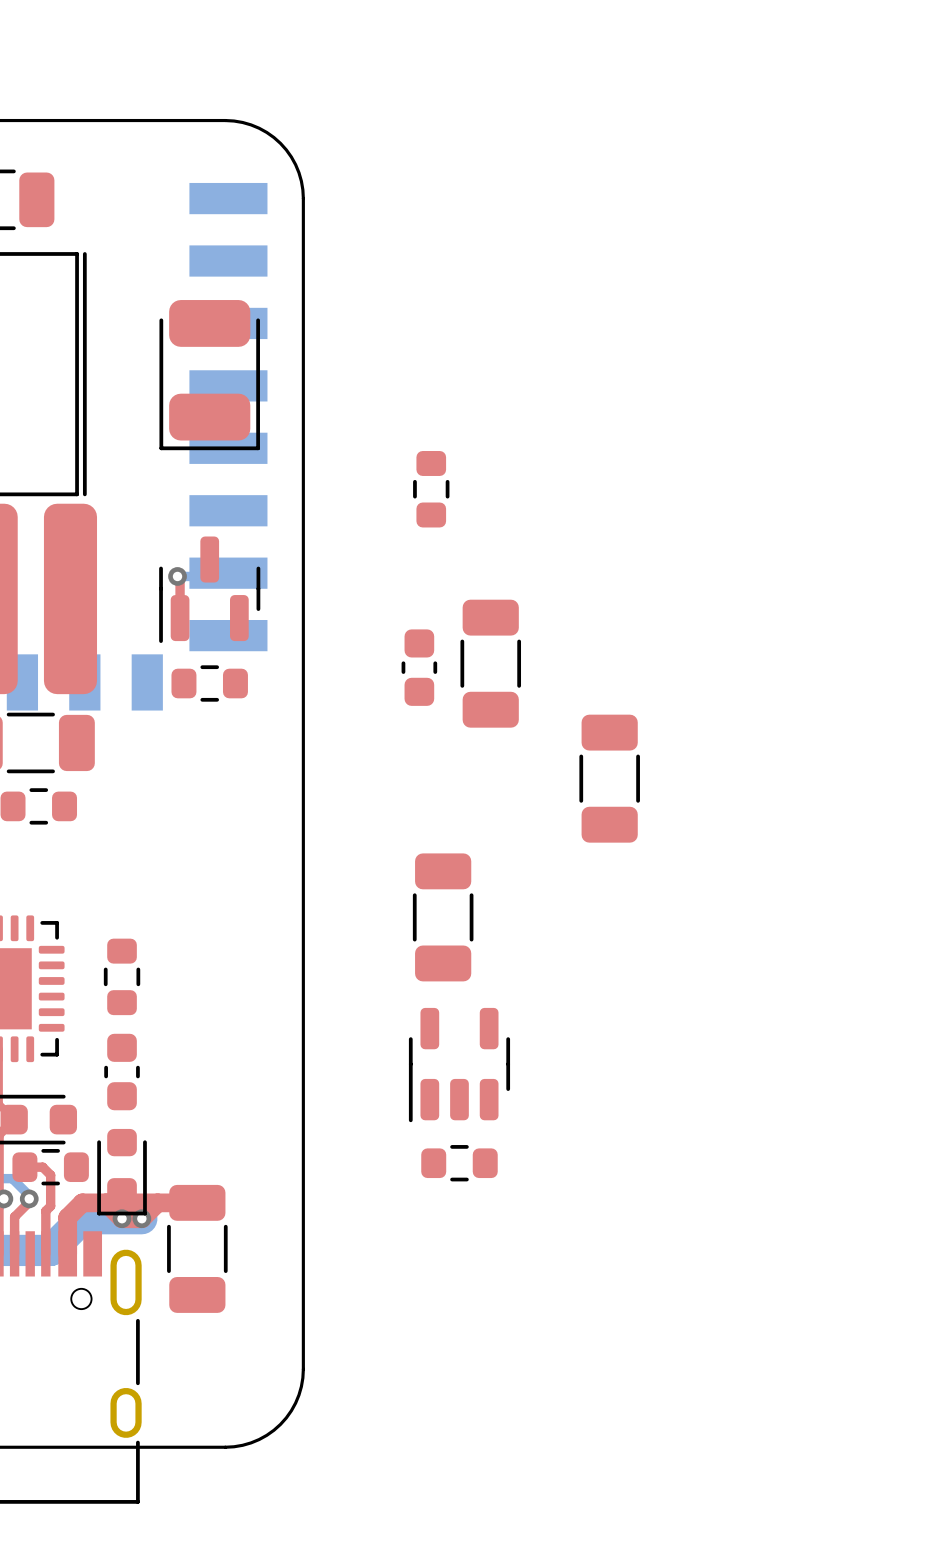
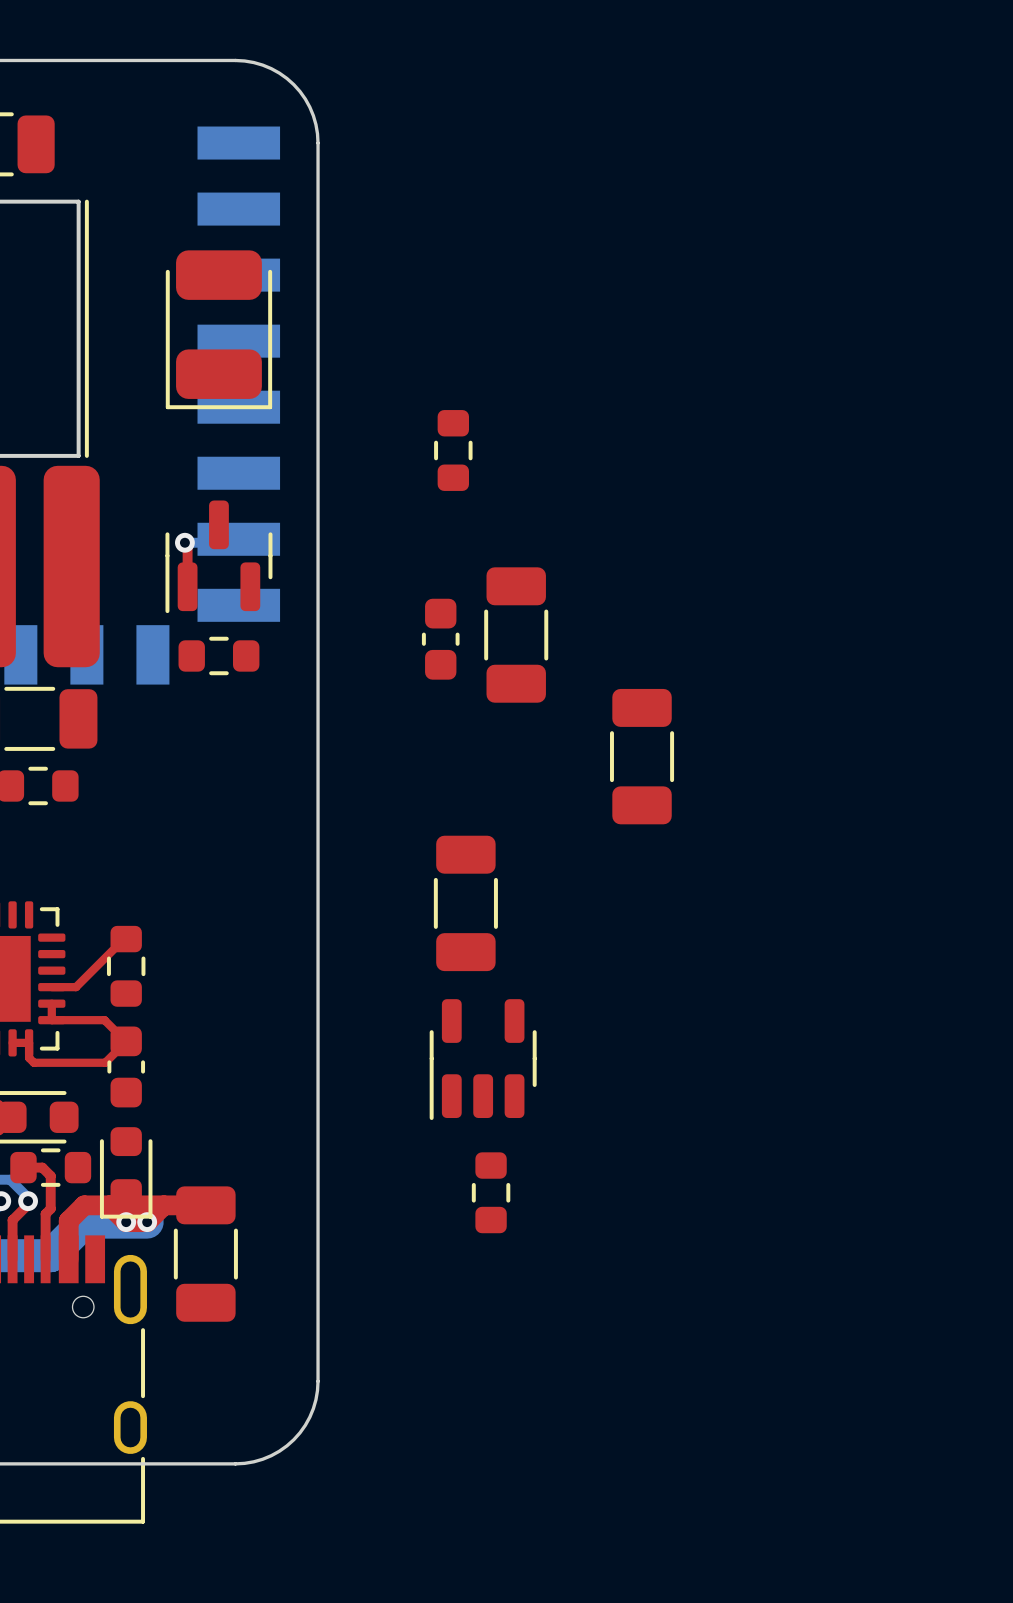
top track: none -> (126, 939) (76, 987) (51, 987)
top track: none -> (51, 1003) (51, 1020) (104, 1020) (125, 1041)
top track: none -> (126, 1041) (105, 1062) (33, 1062) (29, 1057) (29, 1042) (12, 1042)
part rotation: 0° (459, 1163) -> 90° clockwise (491, 1192)

